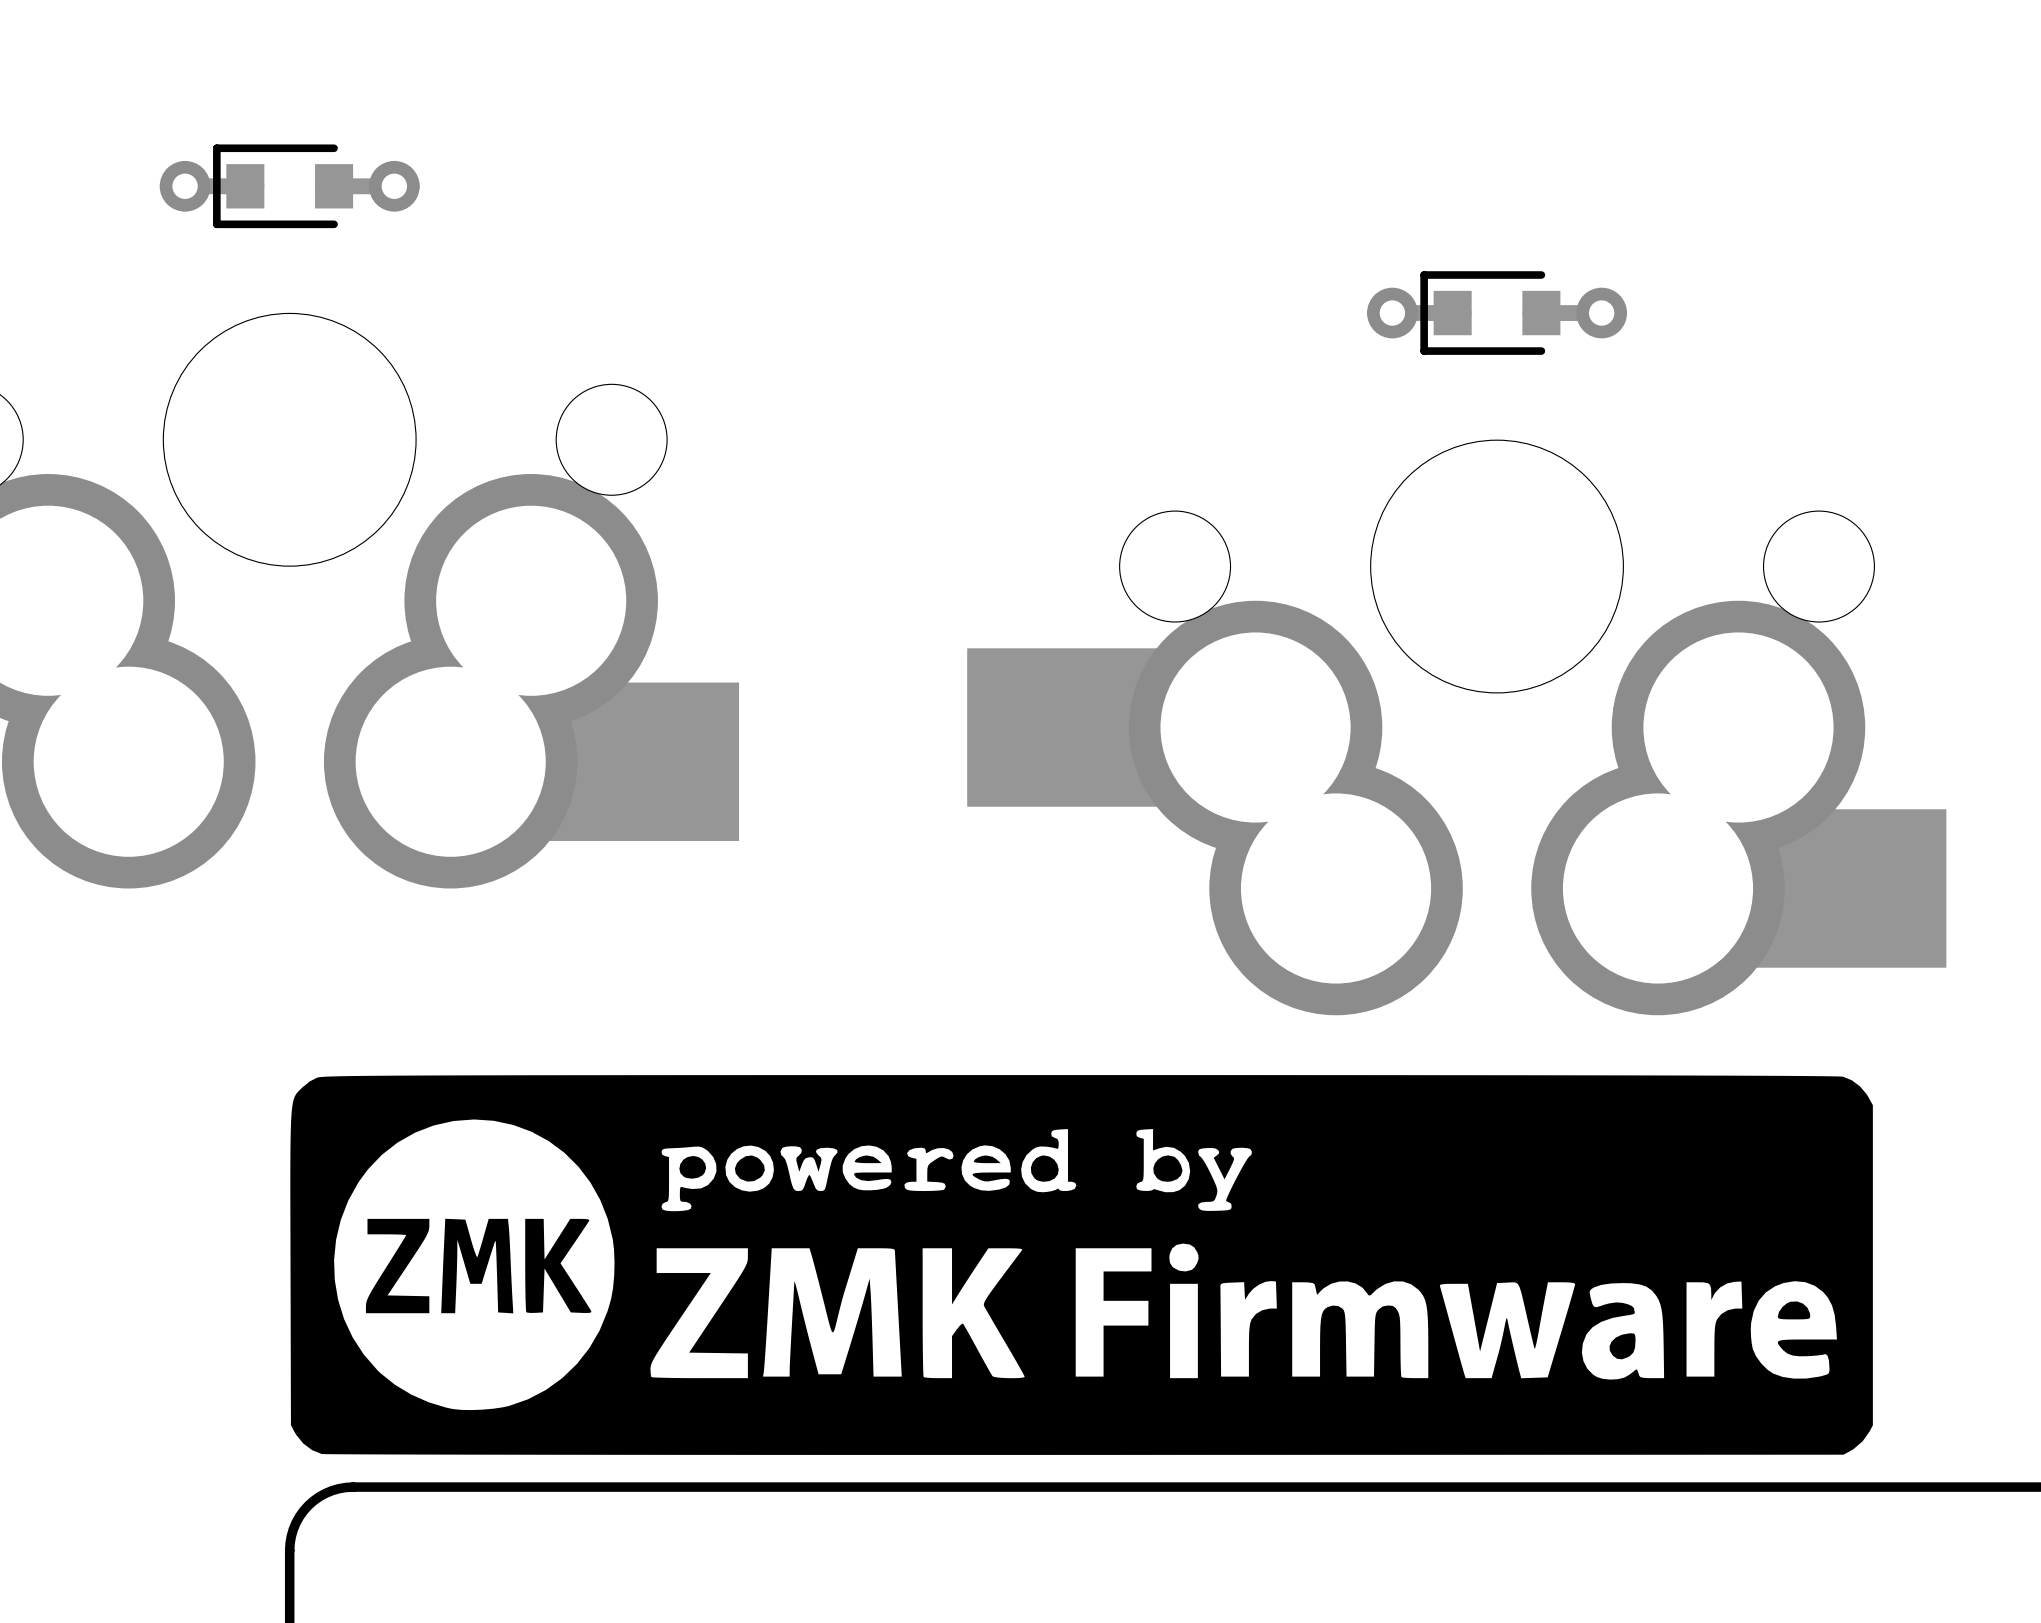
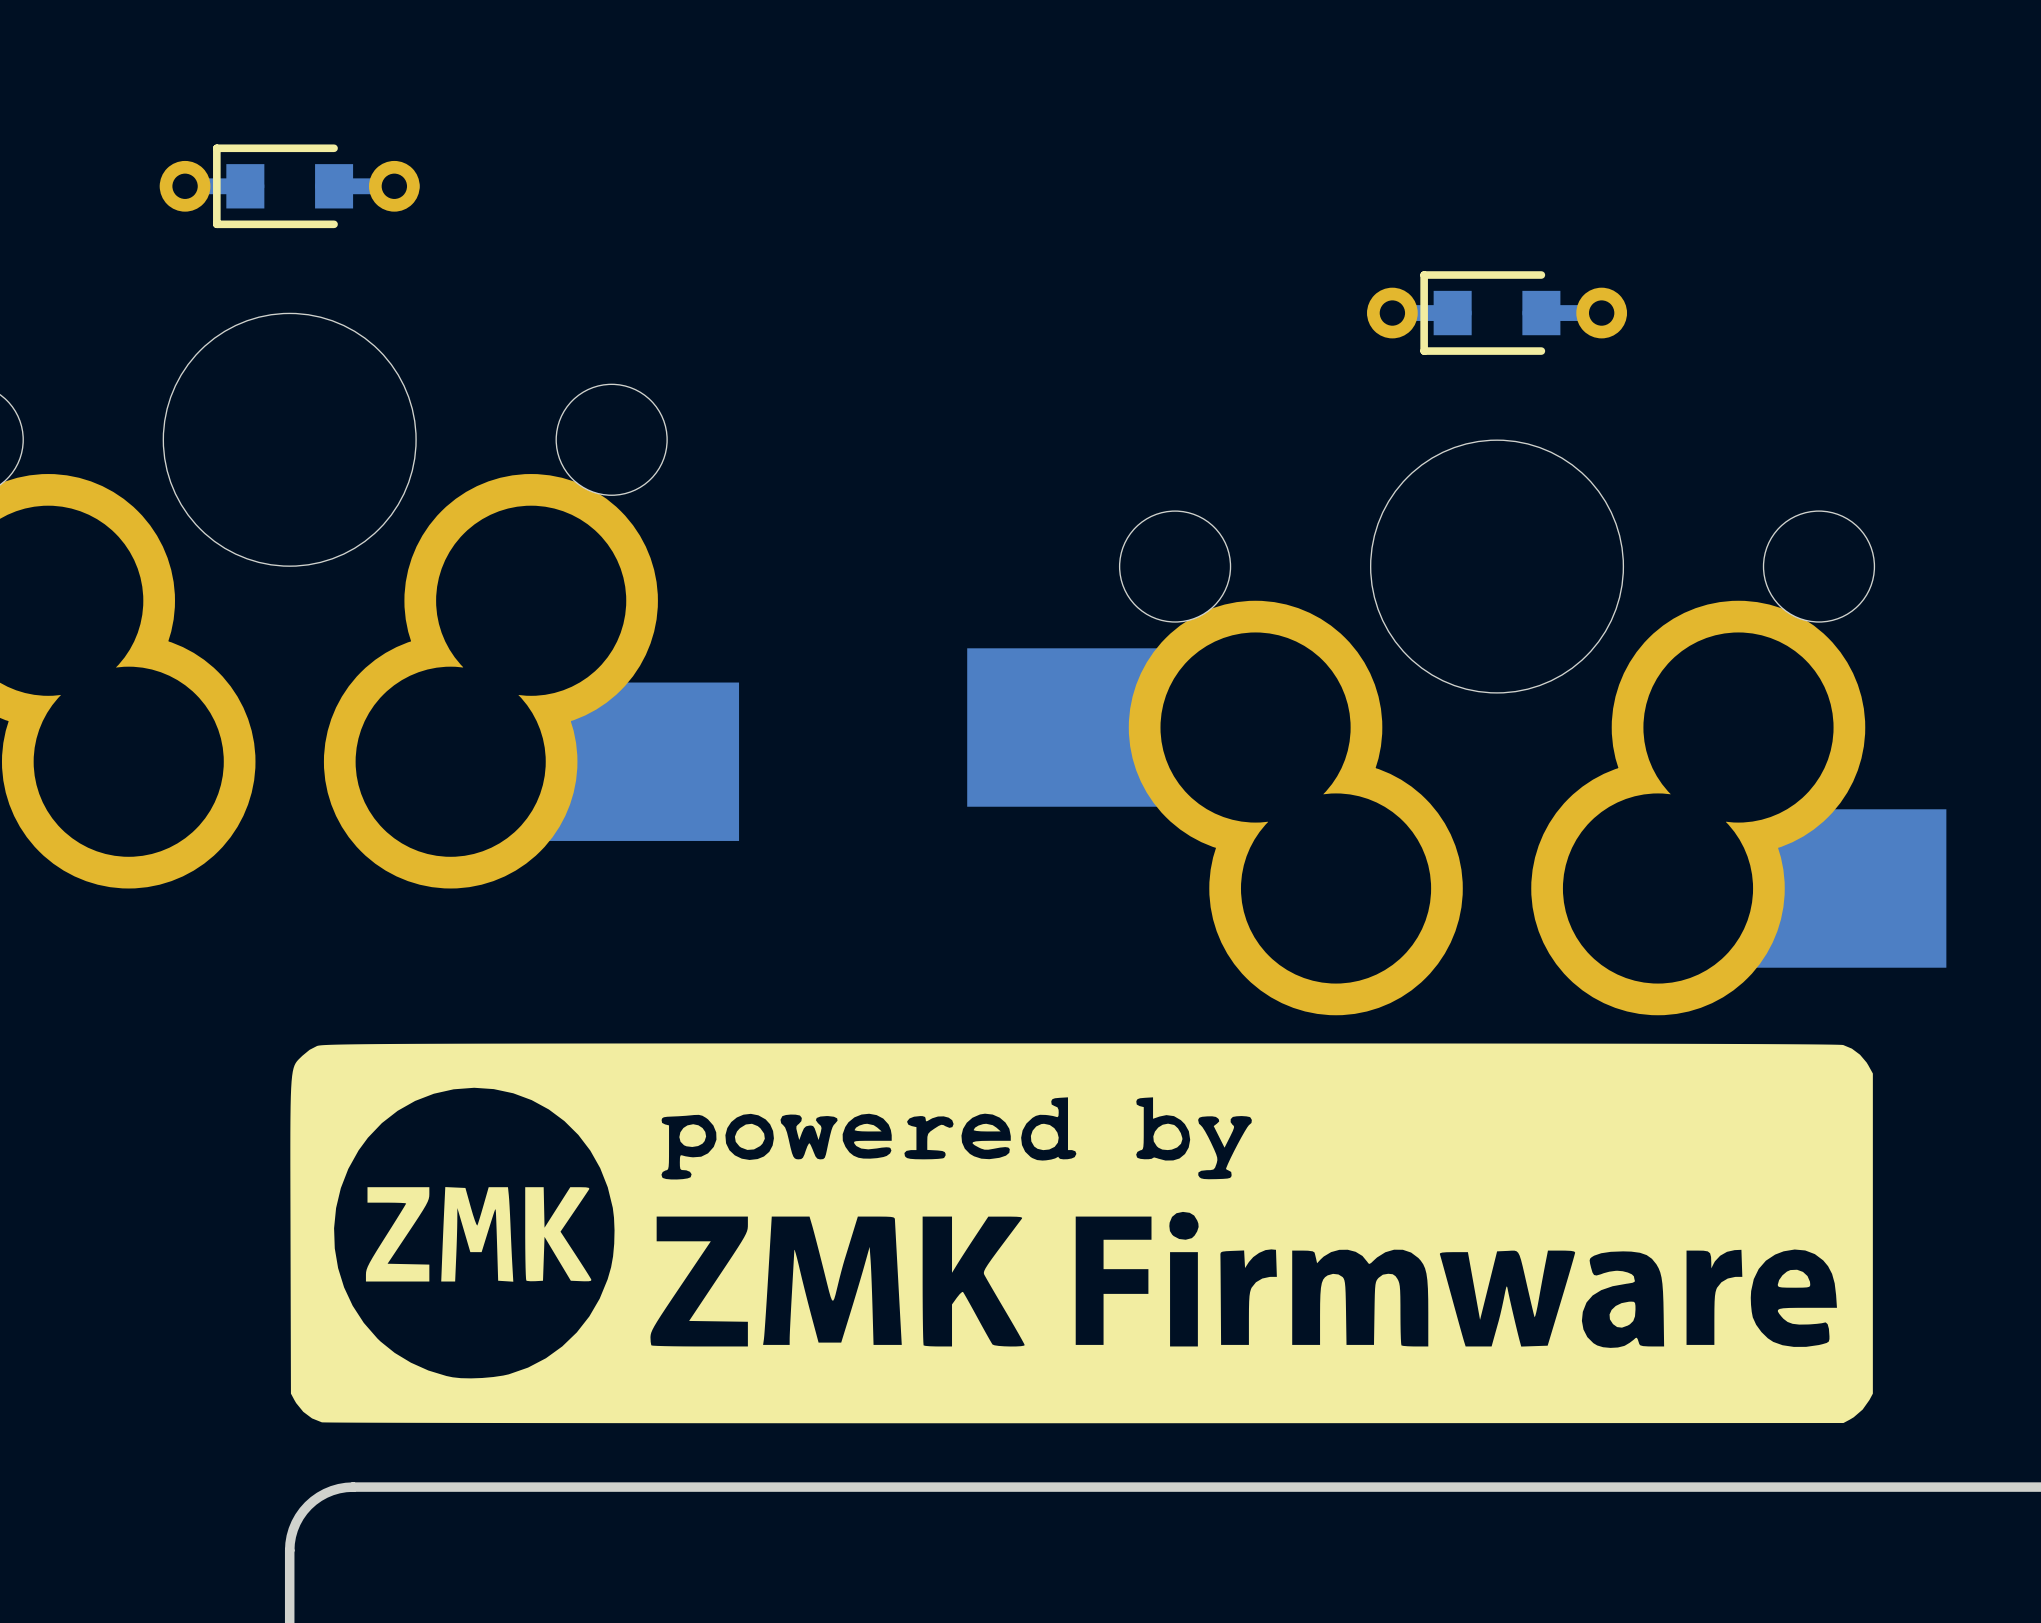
drawing position: (1081, 1265) -> (1081, 1233)

